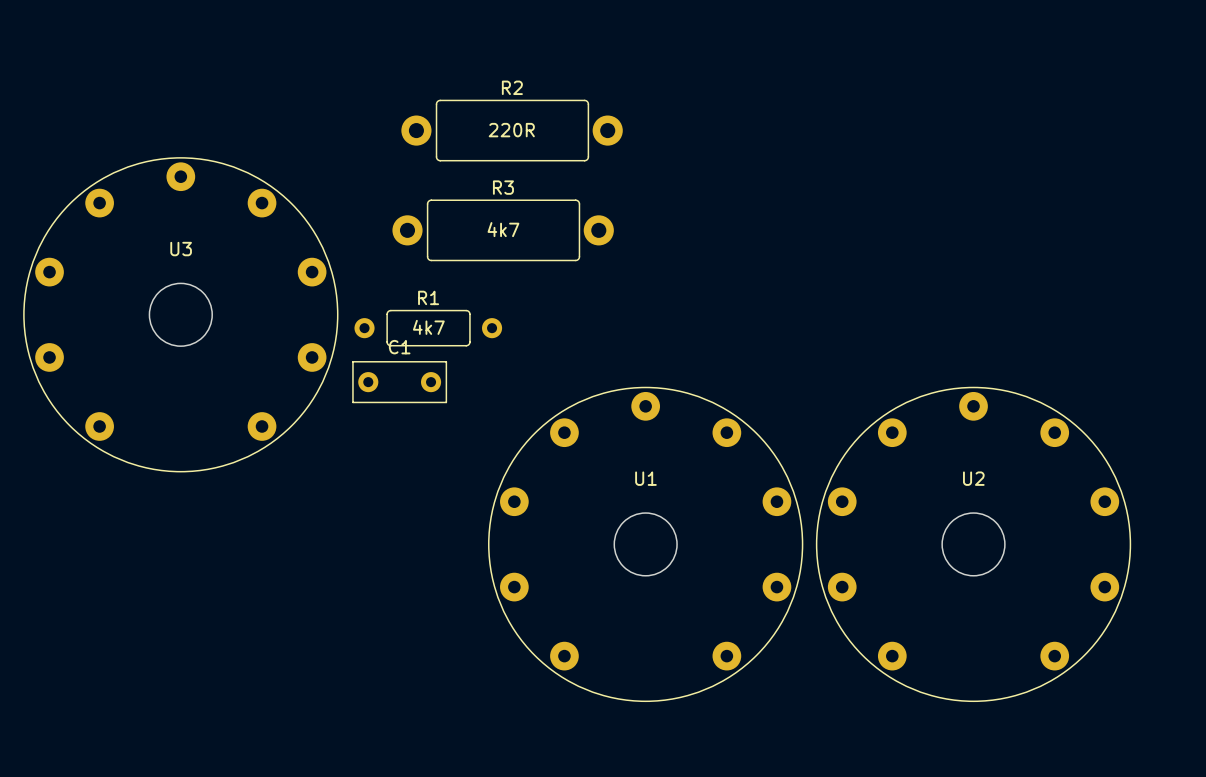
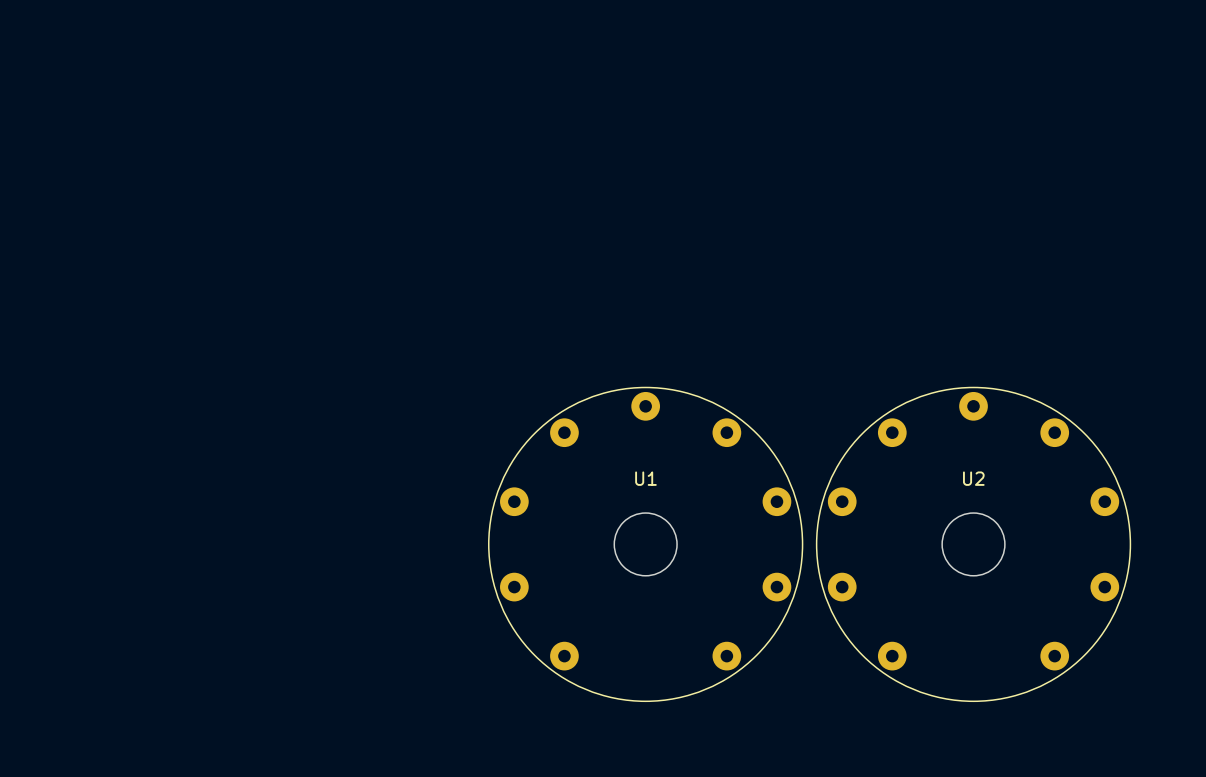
R2: 220R (512, 130) -> none
R3: 4k7 (503, 230) -> none
U3: (180, 314) -> none
R1: 4k7 (428, 328) -> none
C1: (399, 382) -> none

